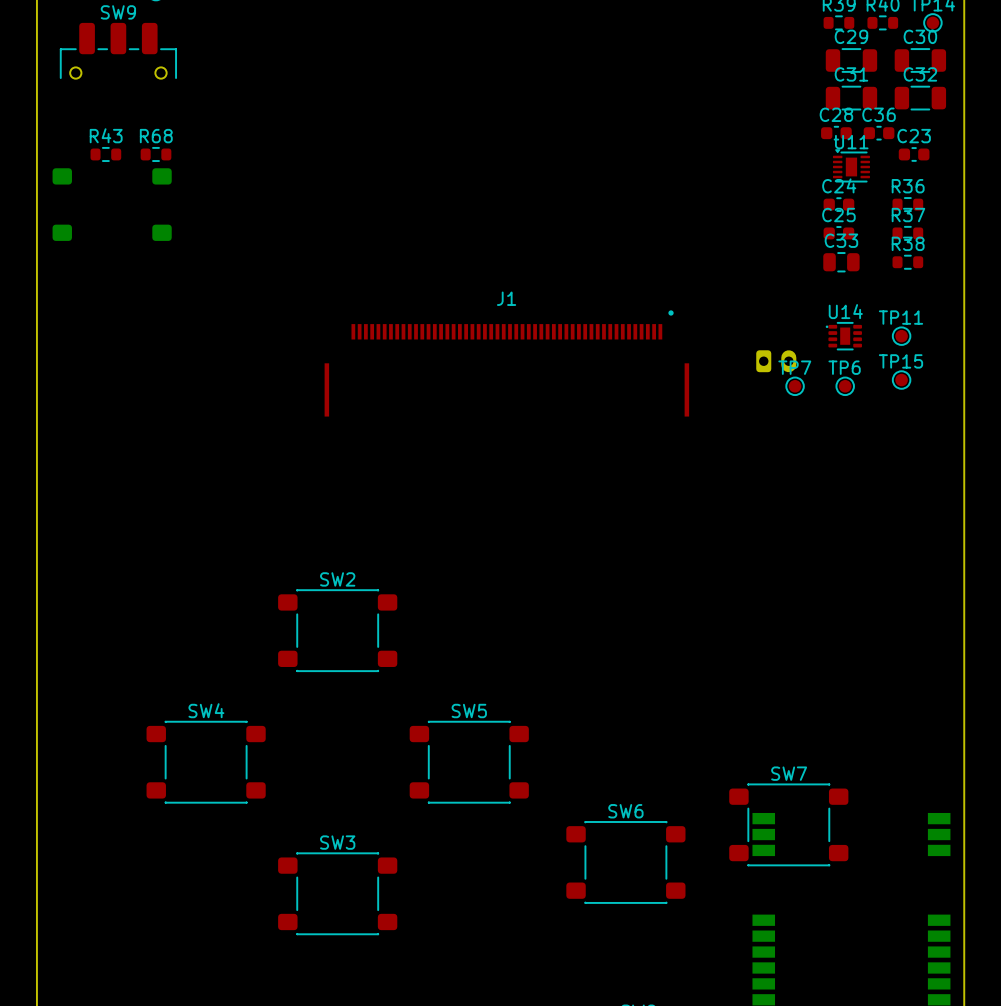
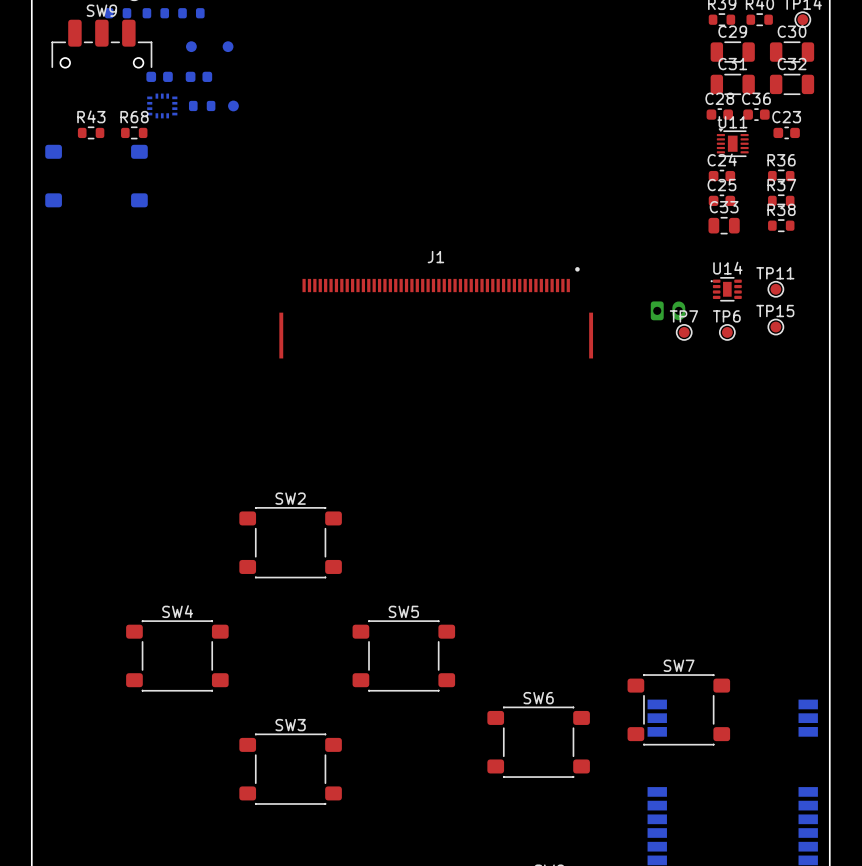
part: none -> (118, 13)
part: none -> (155, 13)
part: none -> (191, 13)
part: none -> (191, 46)
part: none -> (228, 46)
part: none -> (159, 76)
part: none -> (198, 76)
part: none -> (162, 105)
part: none -> (202, 105)
part: none -> (233, 105)

